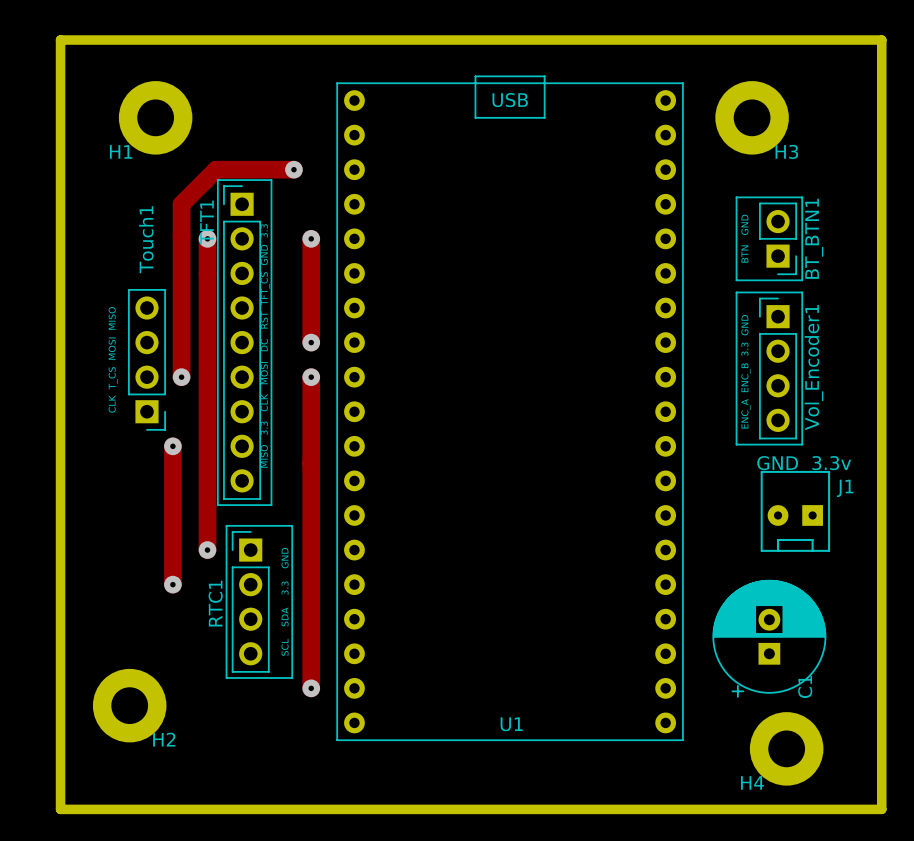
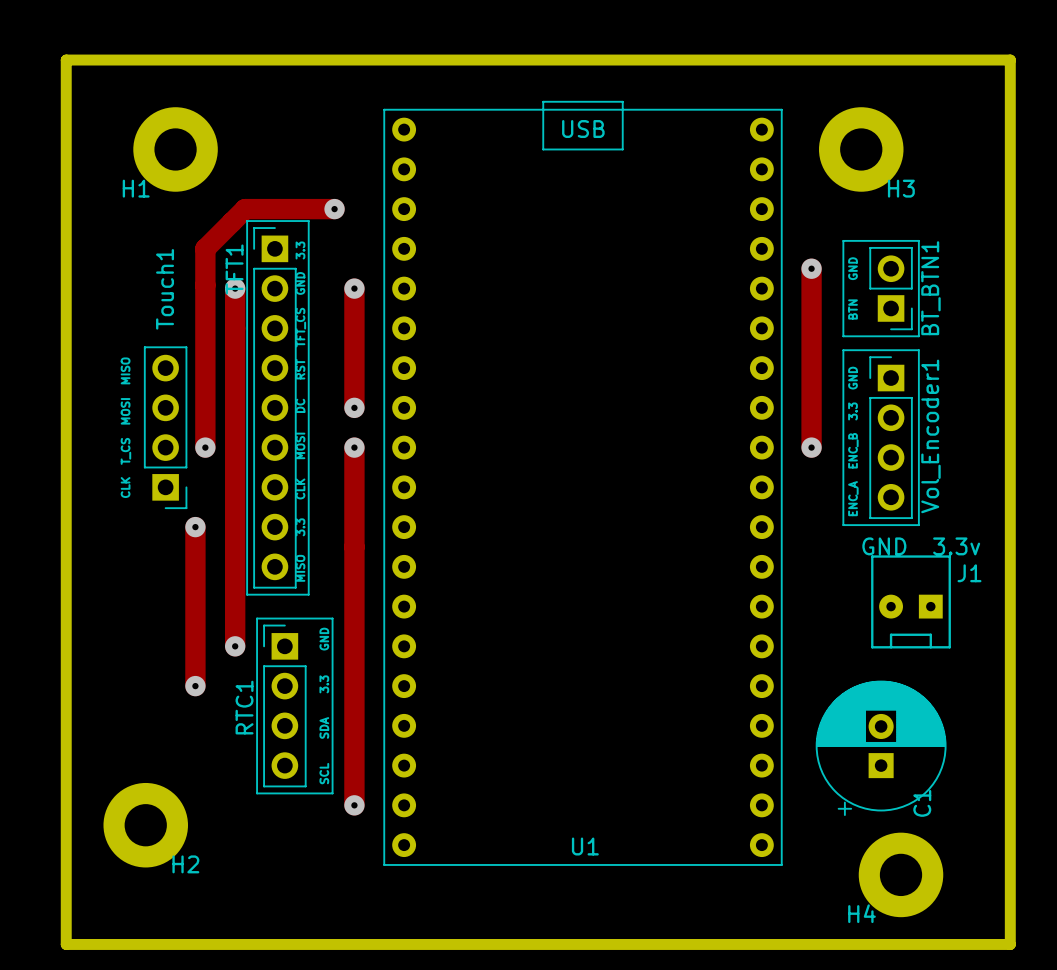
track: none -> (811, 268) (811, 447)
via: none -> (811, 268)
via: none -> (811, 447)

